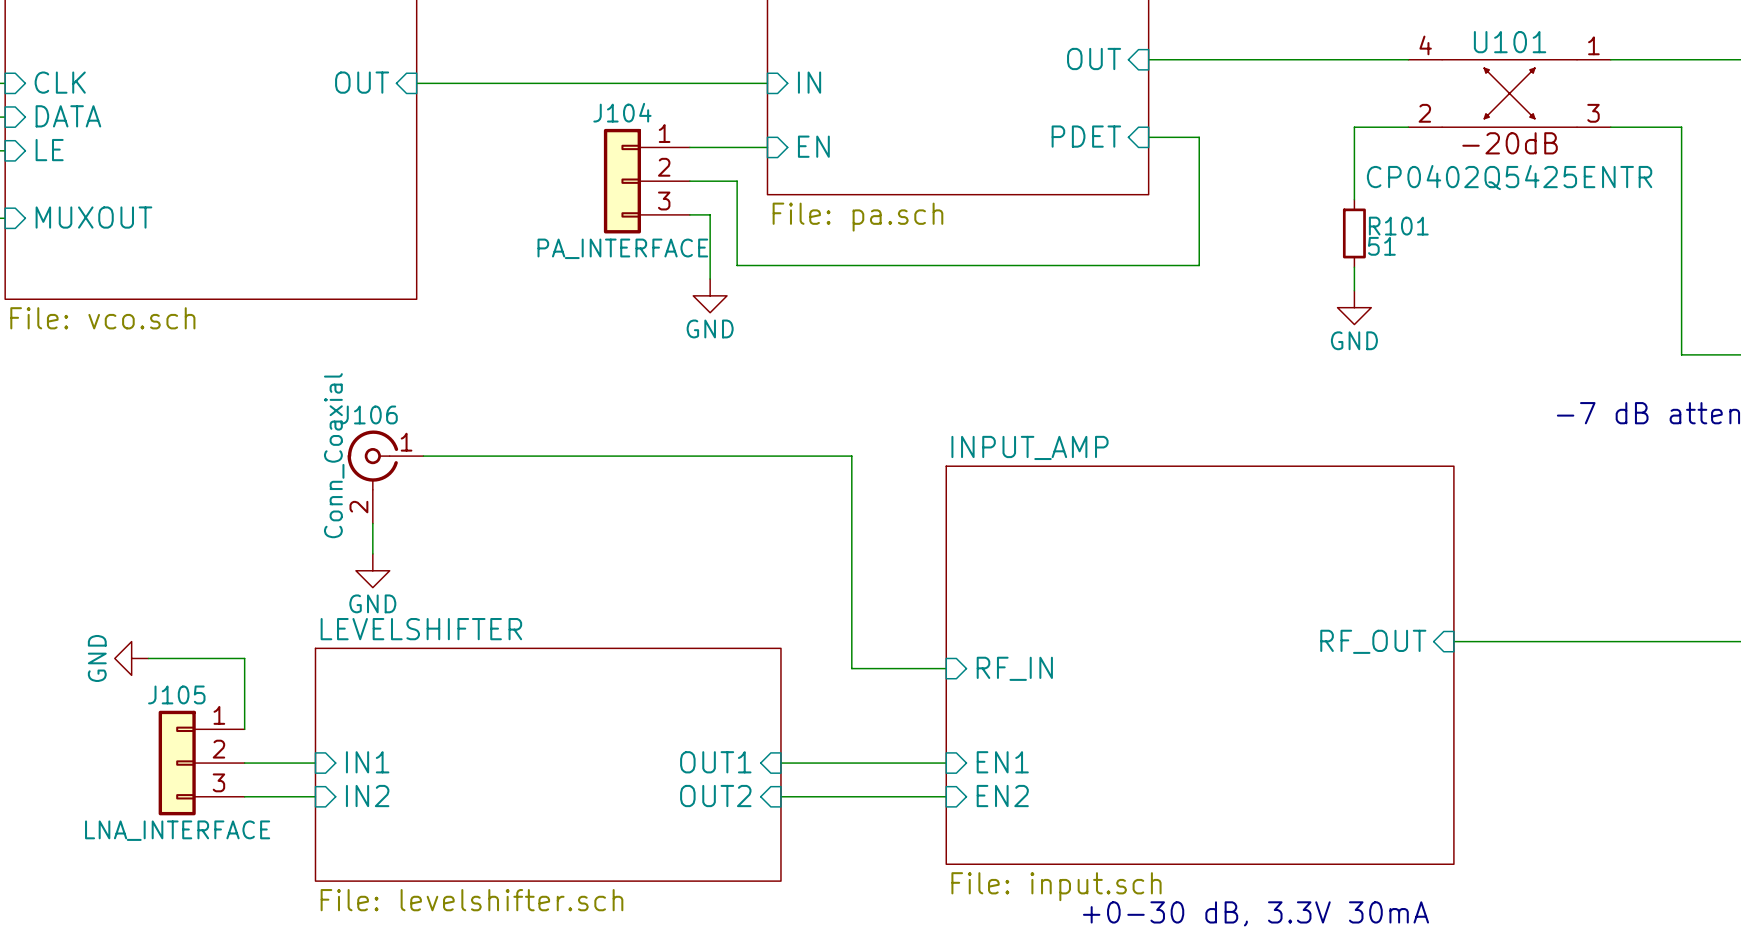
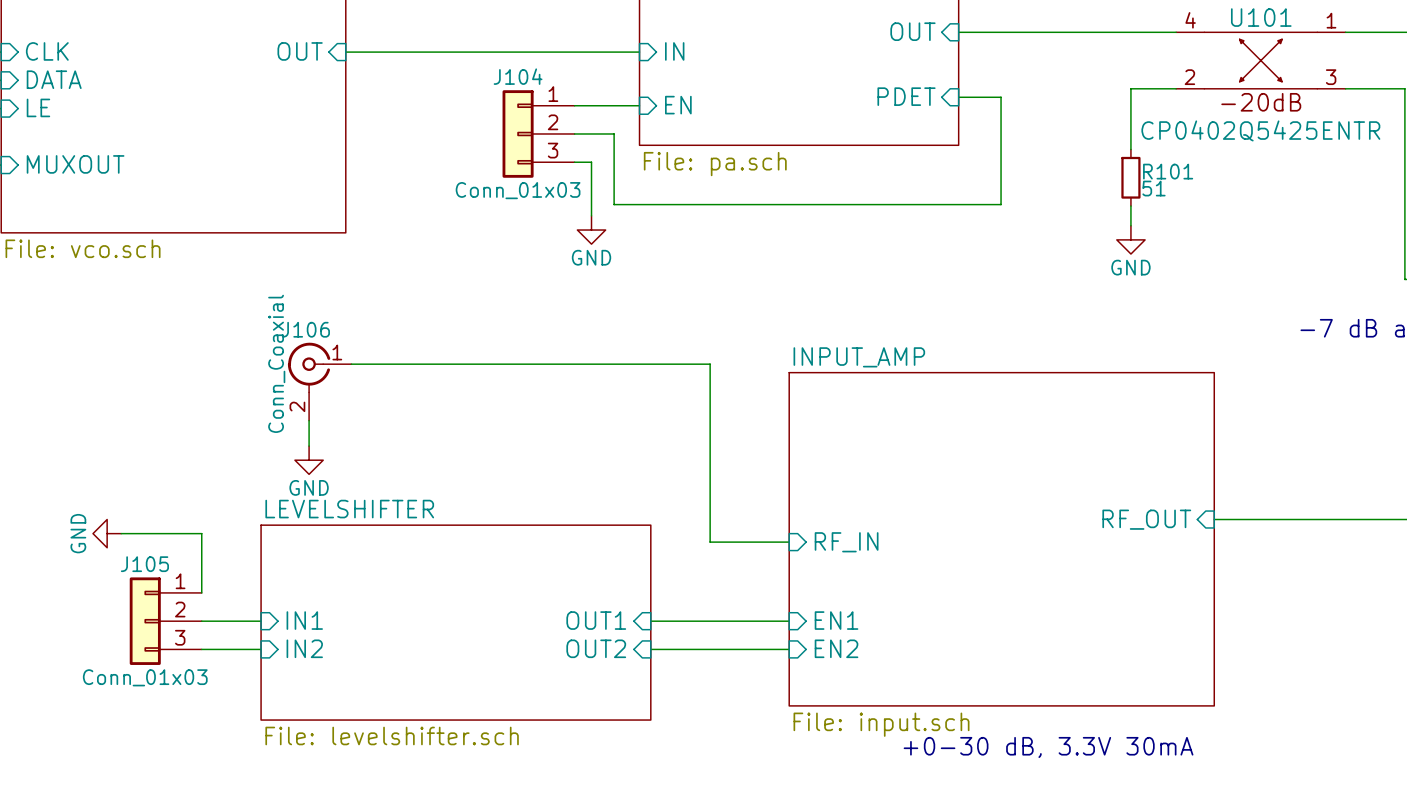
J104 value: PA_INTERFACE (622, 248) -> Conn_01x03 (518, 190)
J105 value: LNA_INTERFACE (177, 830) -> Conn_01x03 (145, 677)

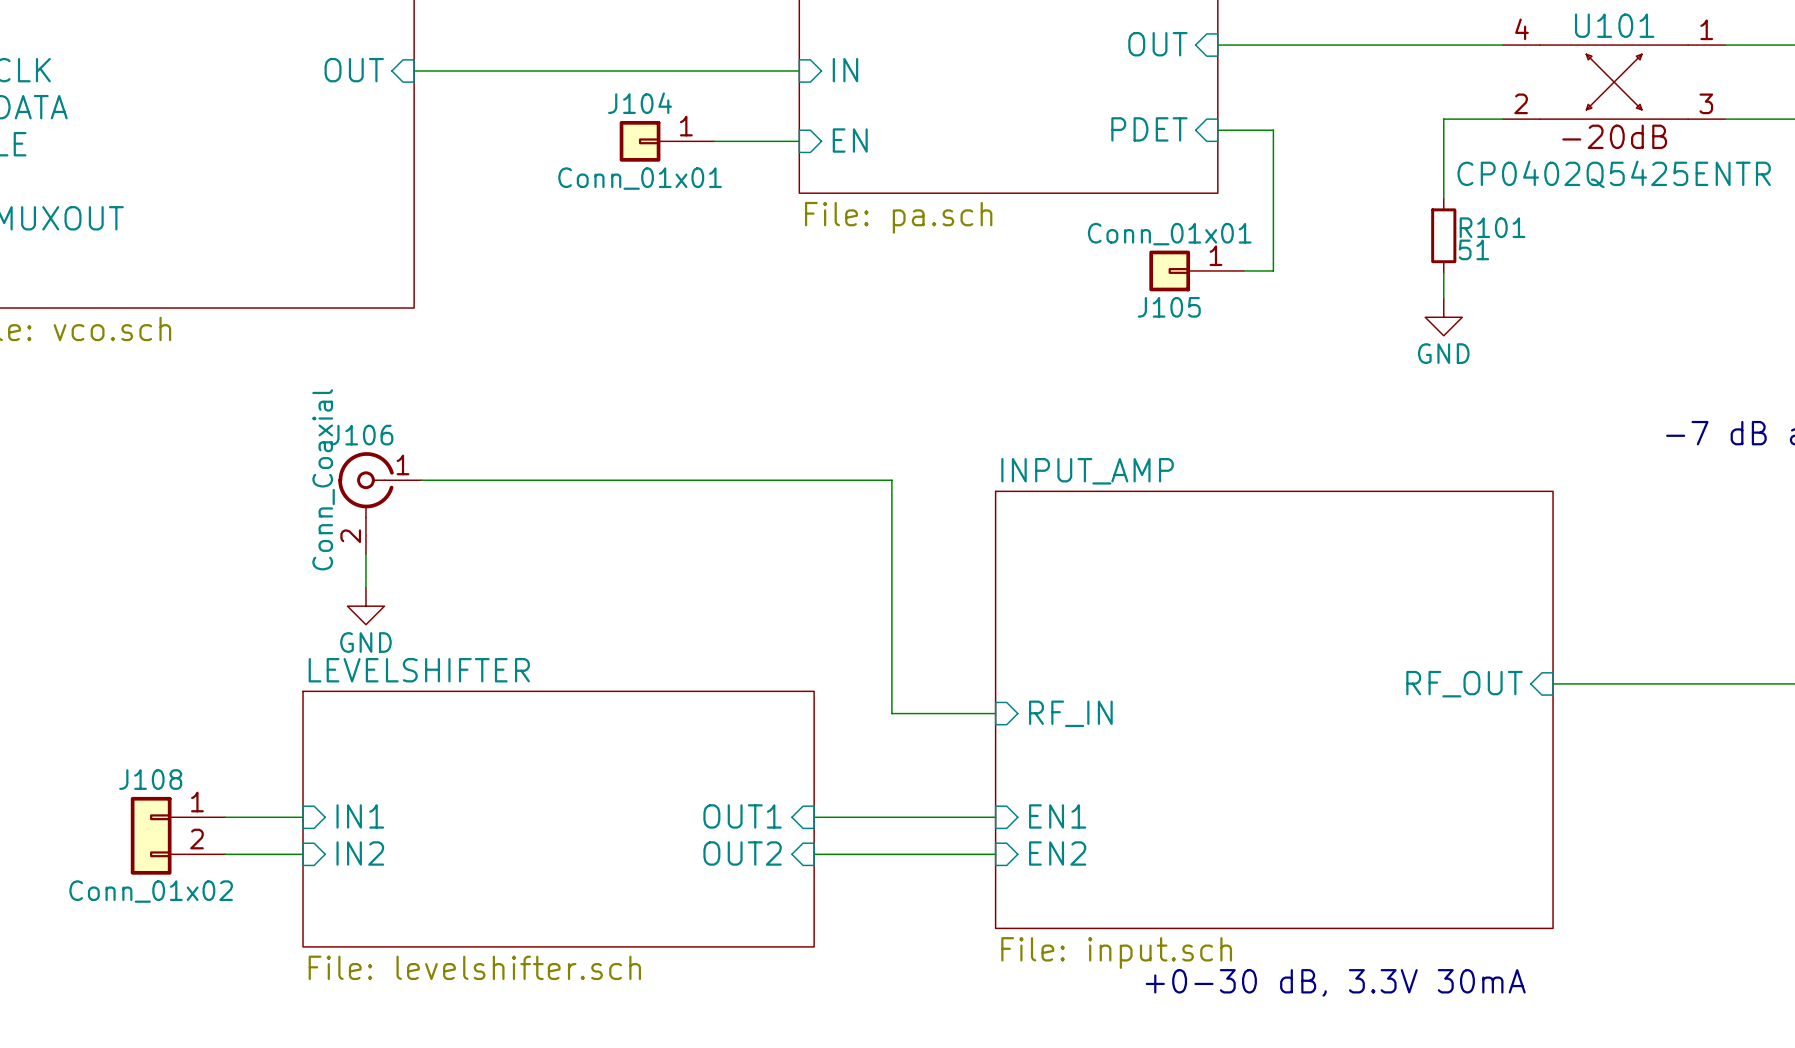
J104 symbol: [502, 90, 575, 178] -> [619, 120, 715, 162]
wire: (574, 133) (614, 133) (614, 204) (978, 204) -> none
wire: (574, 162) (591, 162) (591, 215) -> none
J104 value: Conn_01x03 (518, 190) -> Conn_01x01 (640, 178)
power symbol: GND (591, 230) -> none
power symbol: GND (107, 533) -> none
wire: (121, 533) (201, 533) (201, 592) -> none
J105 name position: J105 (144, 564) -> J105 (1169, 307)
J105 symbol: [129, 577, 202, 665] -> [1149, 250, 1244, 292]
J108: none -> Conn_01x02 (178, 835)
J105 value: Conn_01x03 (145, 677) -> Conn_01x01 (1169, 234)

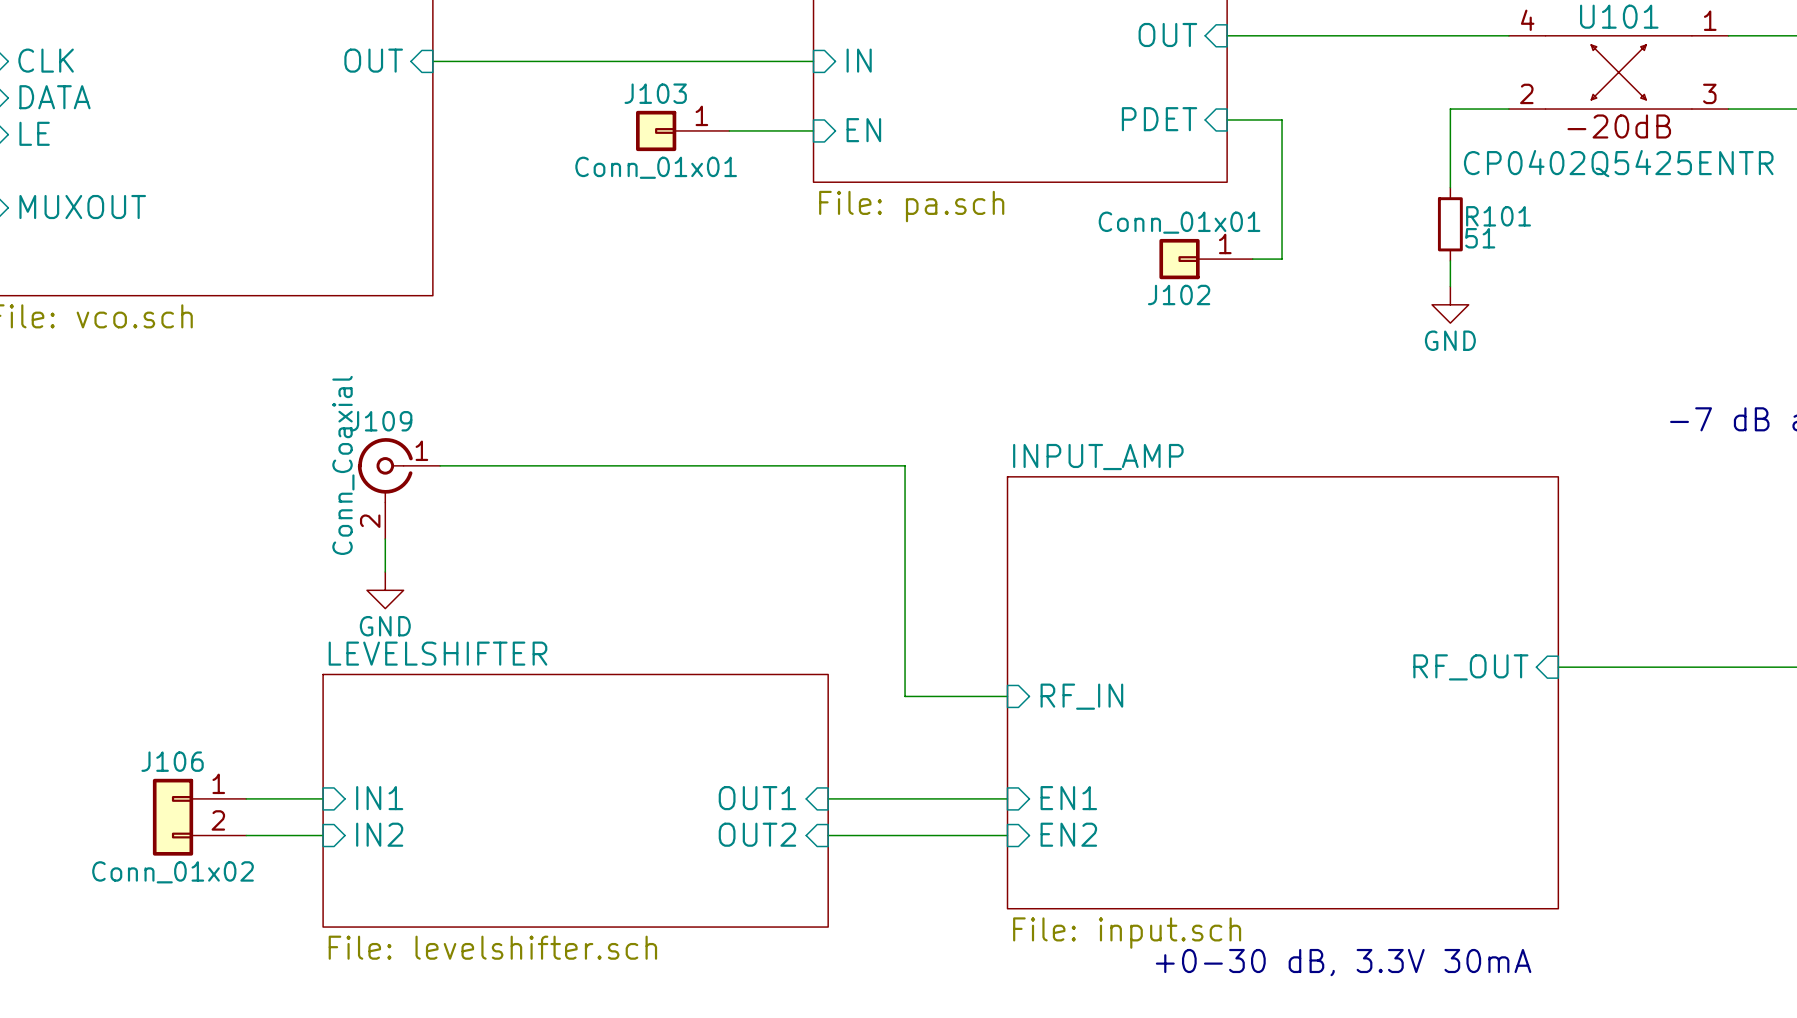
J104 name: J104 (640, 103) -> J103 (655, 93)
J105 name: J105 (1169, 307) -> J102 (1179, 294)
J106 name: J106 (361, 435) -> J109 (381, 421)
J108 name: J108 (150, 779) -> J106 (172, 761)

